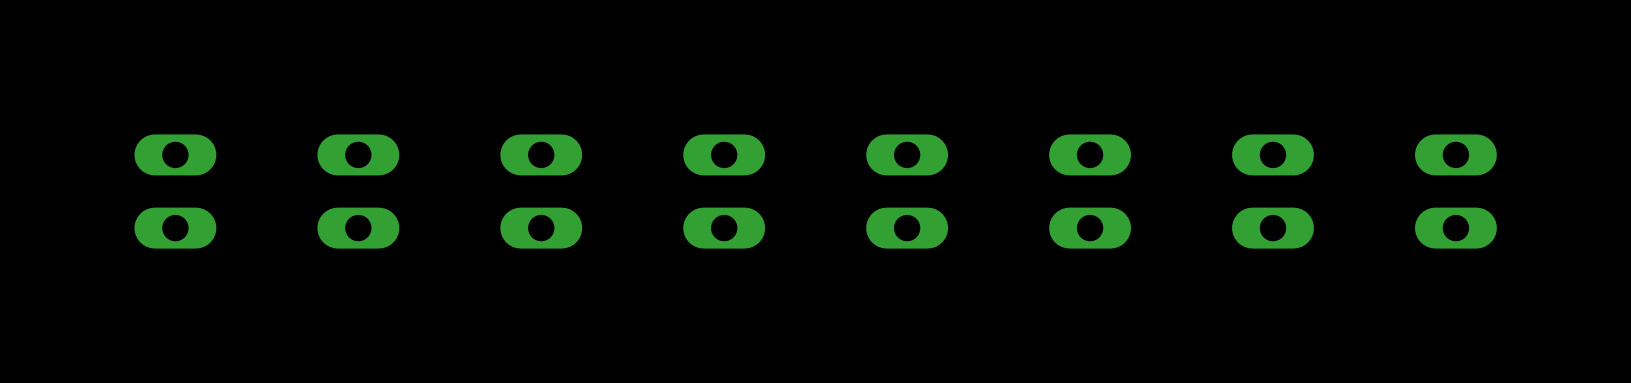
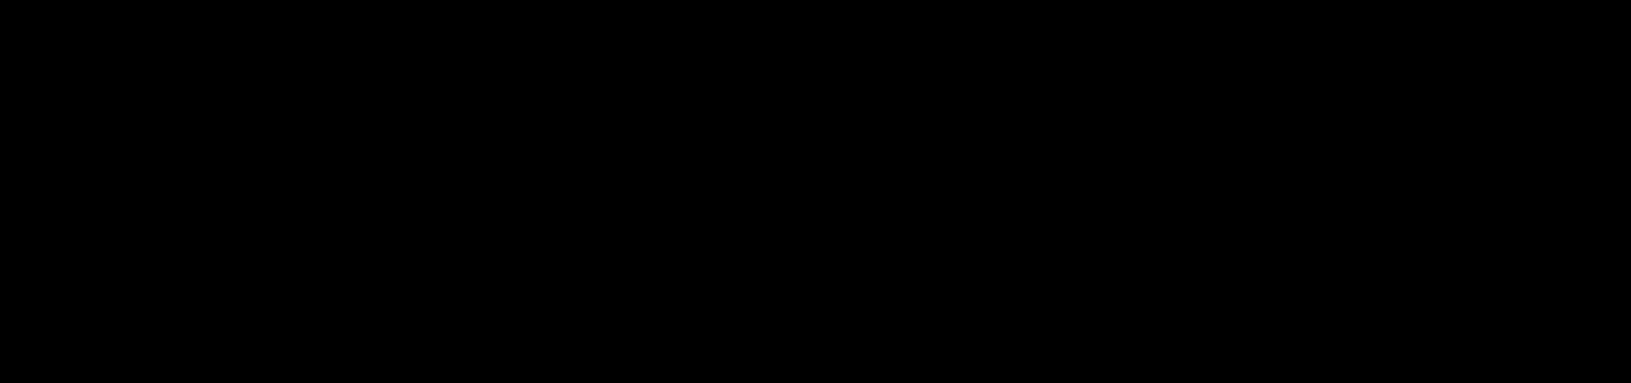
part: (175, 191) -> none
part: (358, 191) -> none
part: (541, 191) -> none
part: (724, 191) -> none
part: (907, 191) -> none
part: (1090, 191) -> none
part: (1272, 191) -> none
part: (1455, 191) -> none

